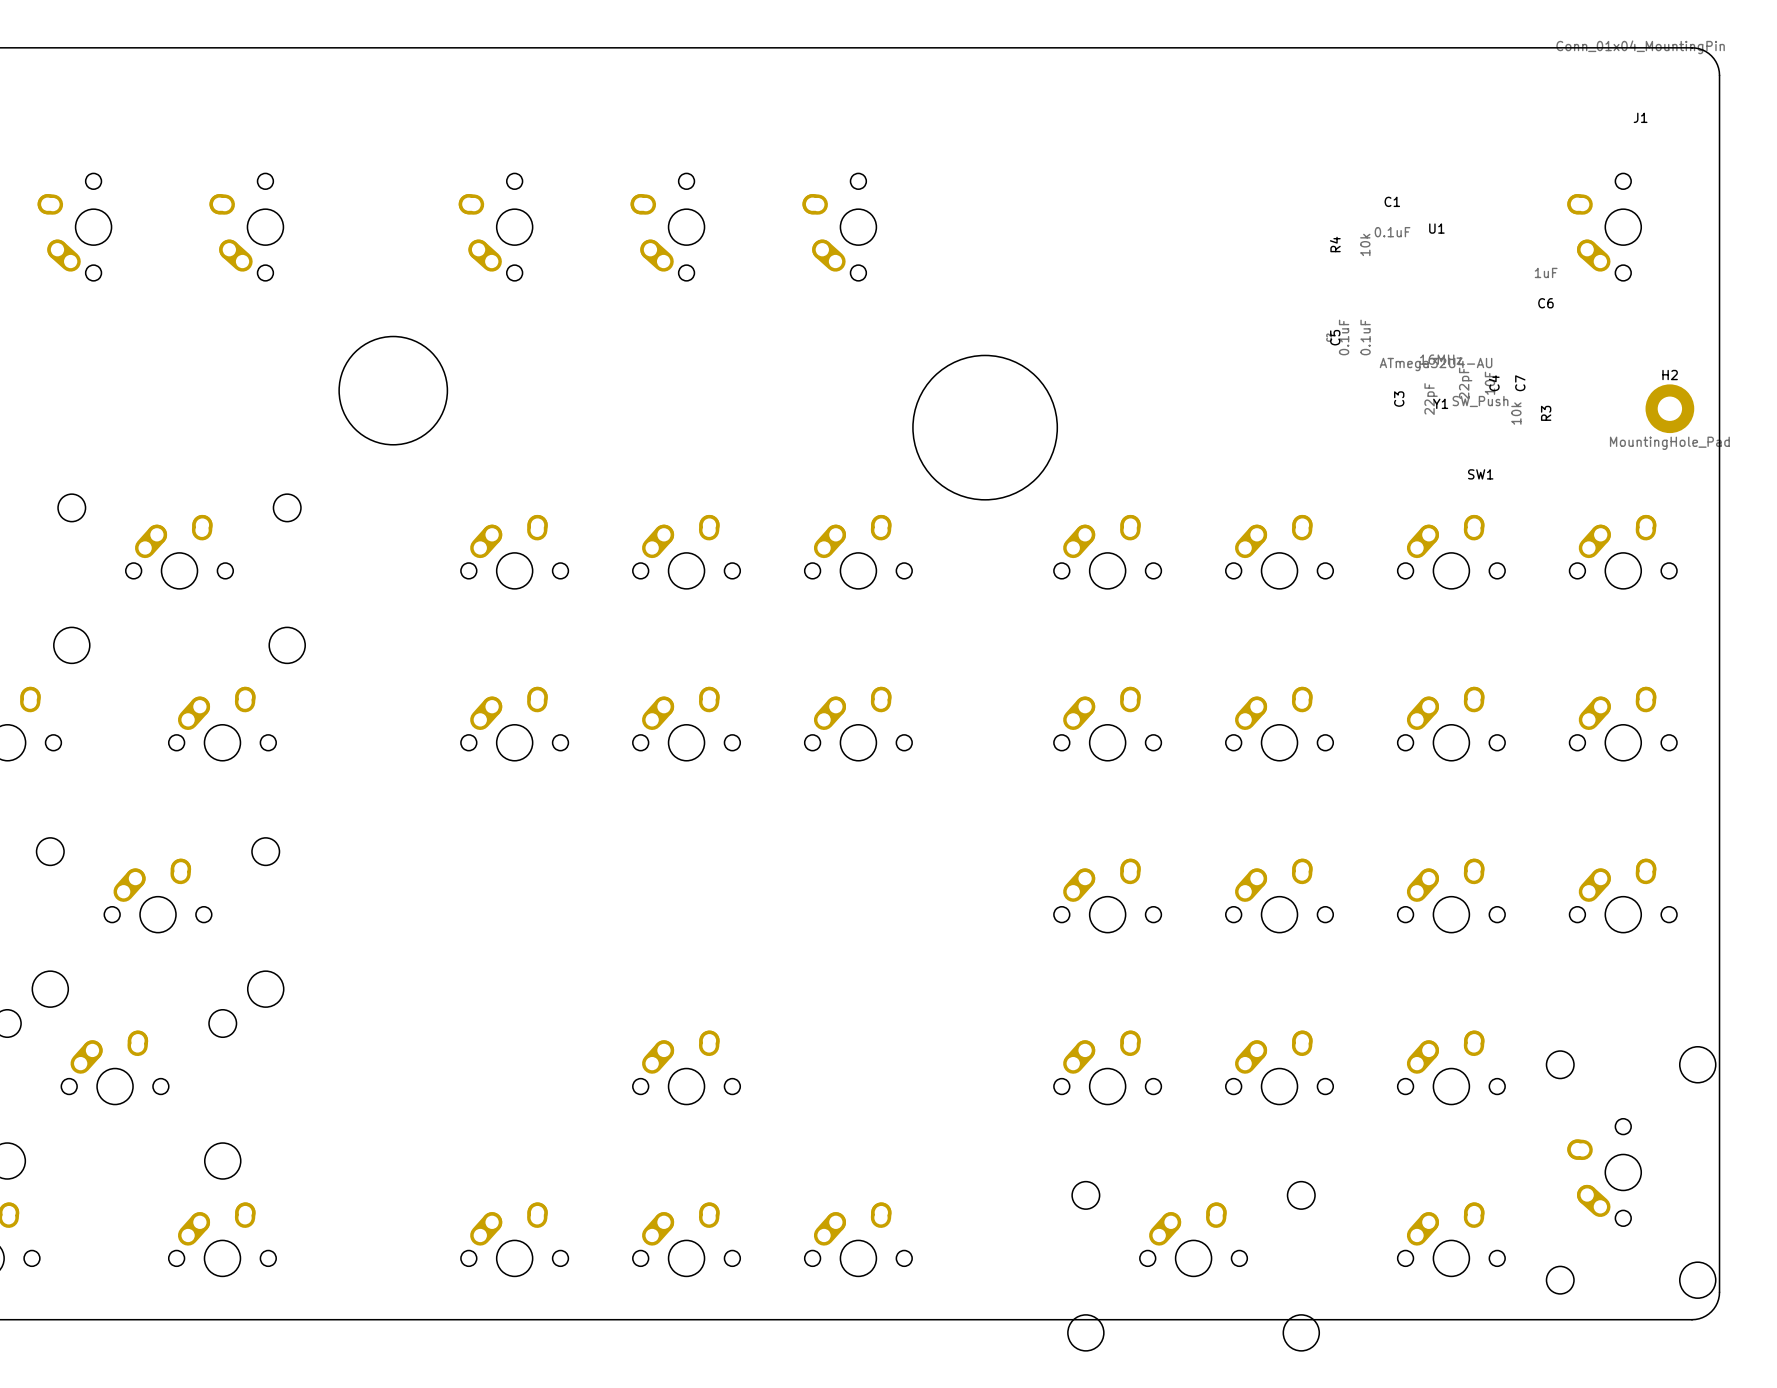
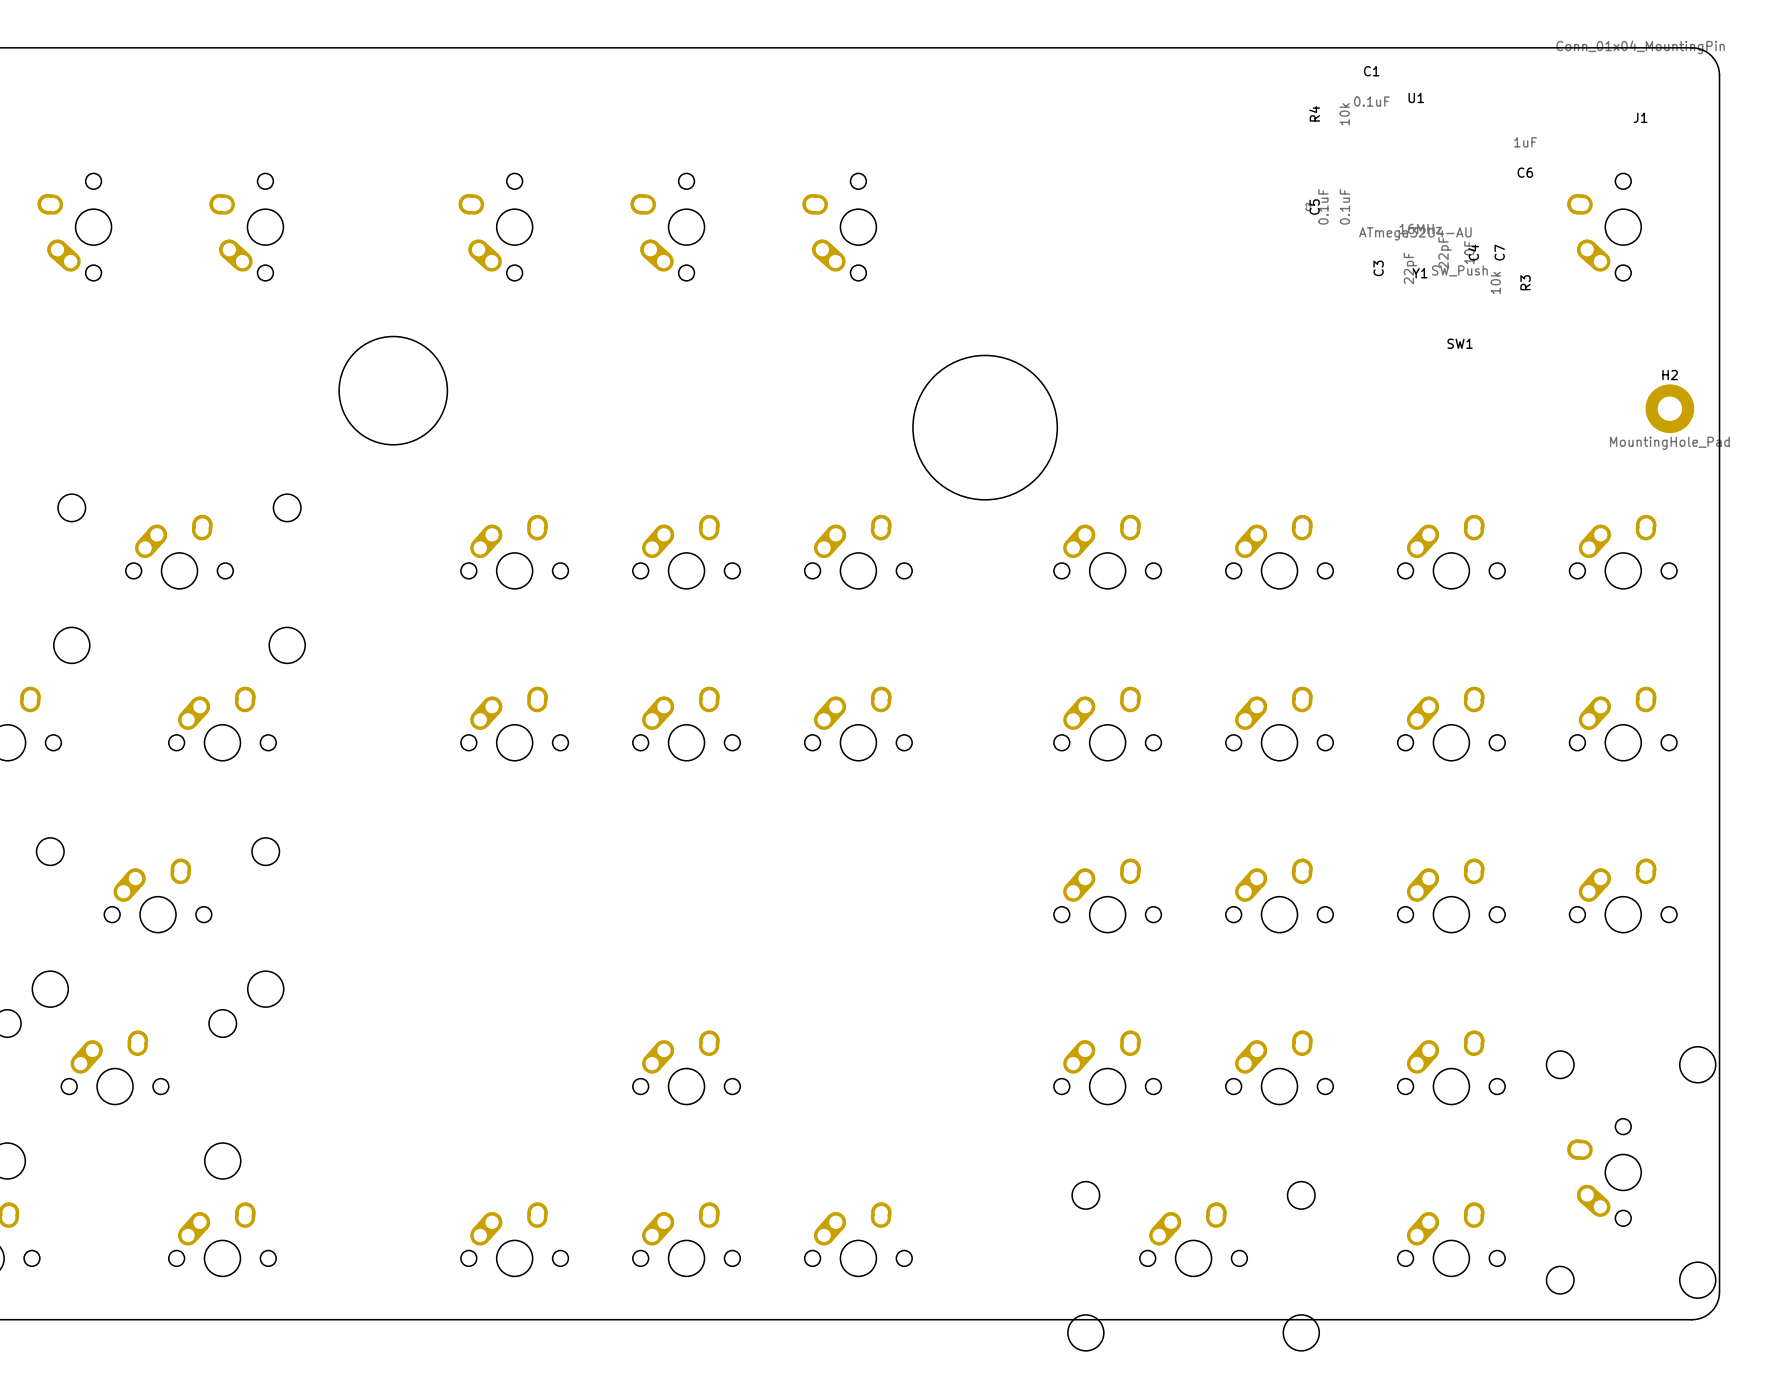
C1 position: (1392, 217) -> (1371, 86)
R4 position: (1350, 244) -> (1329, 114)
C6 position: (1546, 288) -> (1525, 157)
U1 position: (1436, 297) -> (1415, 166)
part position: (1337, 337) -> (1317, 206)
C5 position: (1350, 337) -> (1329, 206)
Y1 position: (1441, 381) -> (1420, 251)
C4 position: (1479, 383) -> (1458, 252)
C7 position: (1505, 383) -> (1484, 252)
C3 position: (1415, 399) -> (1395, 268)
R3 position: (1531, 413) -> (1510, 282)
SW1 position: (1480, 437) -> (1459, 307)

